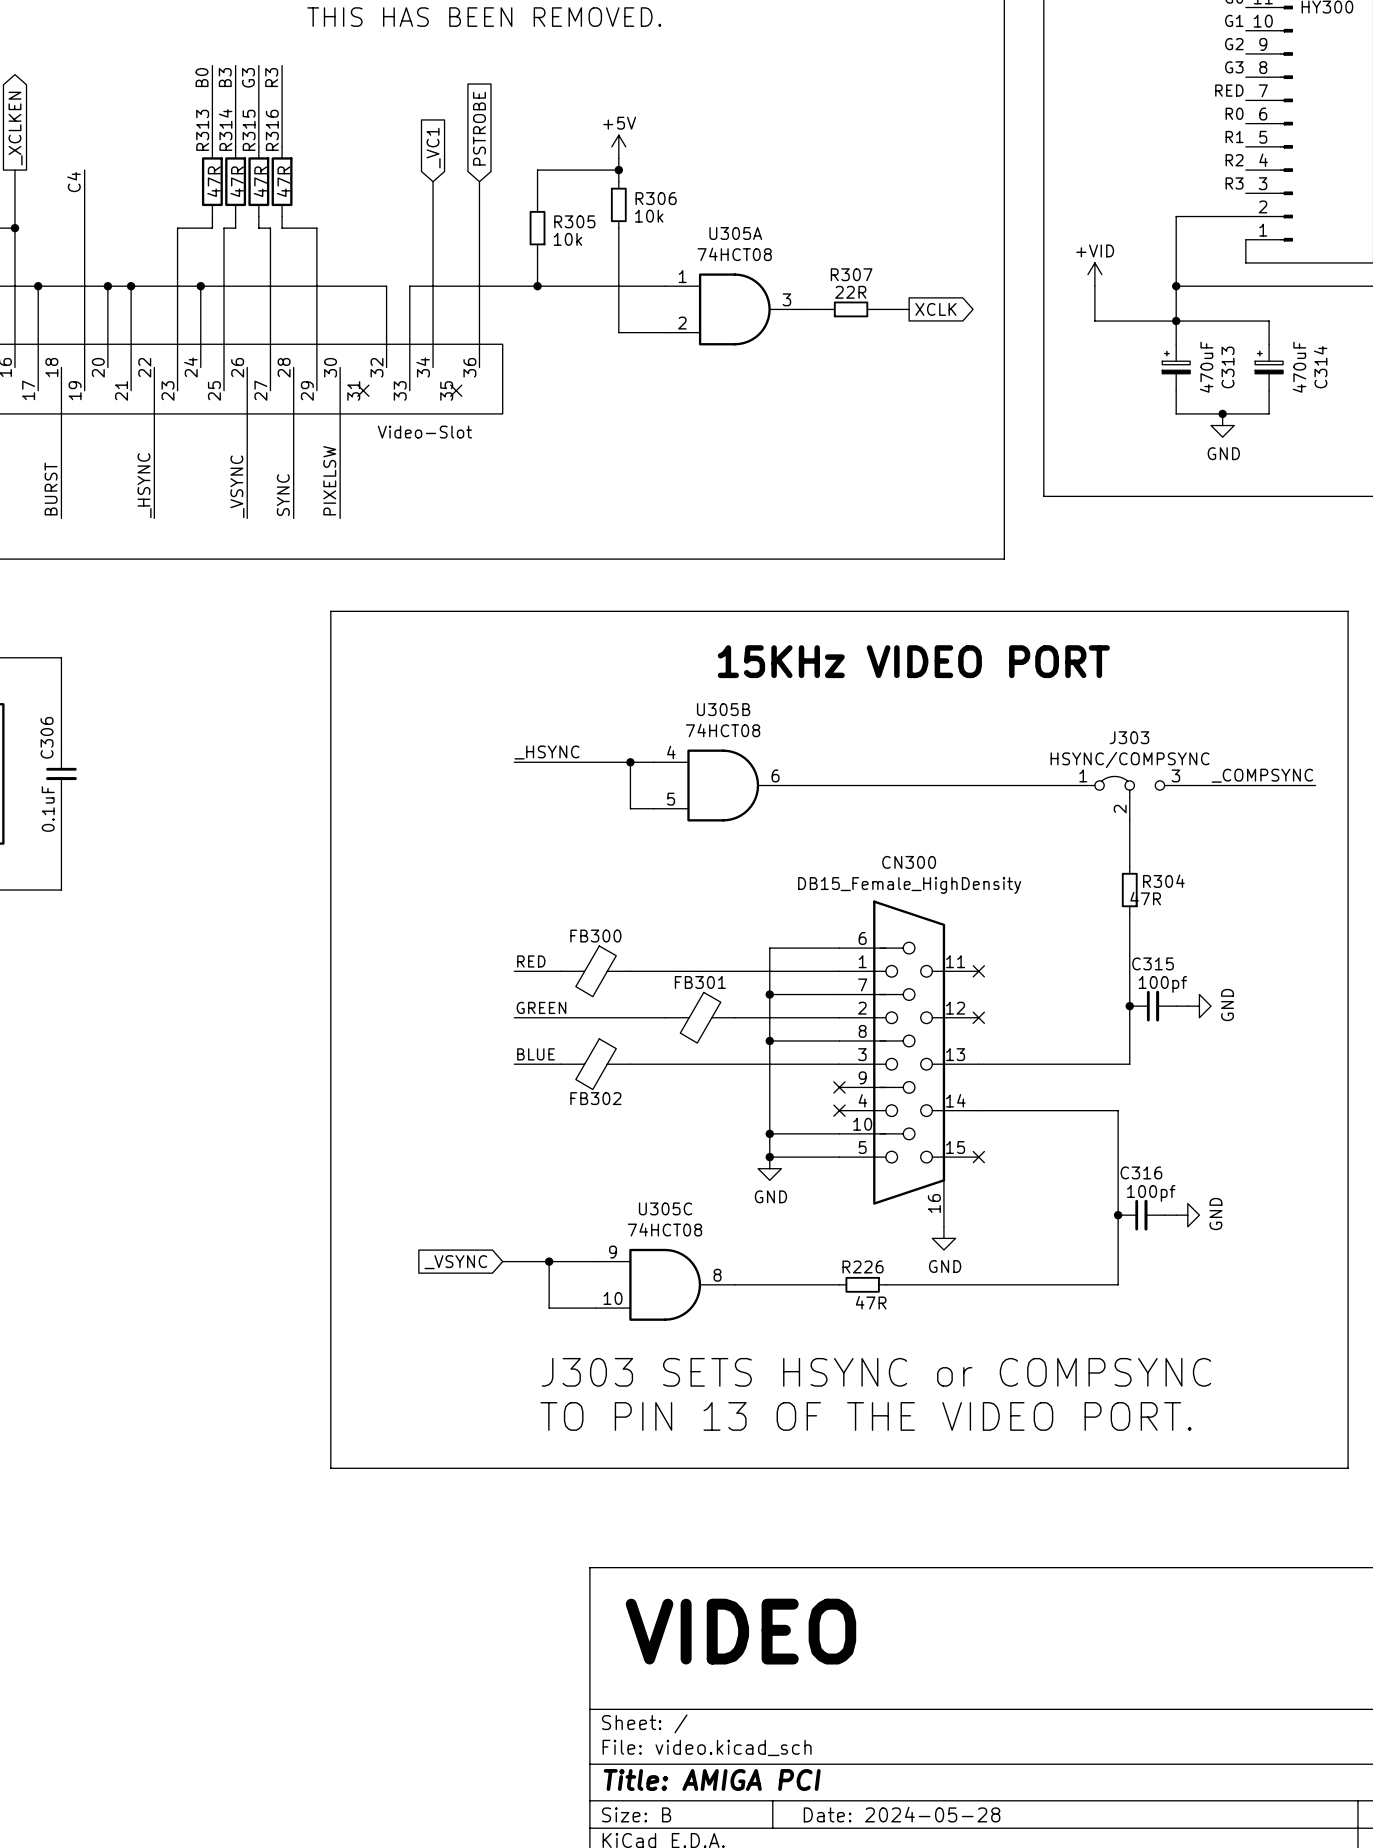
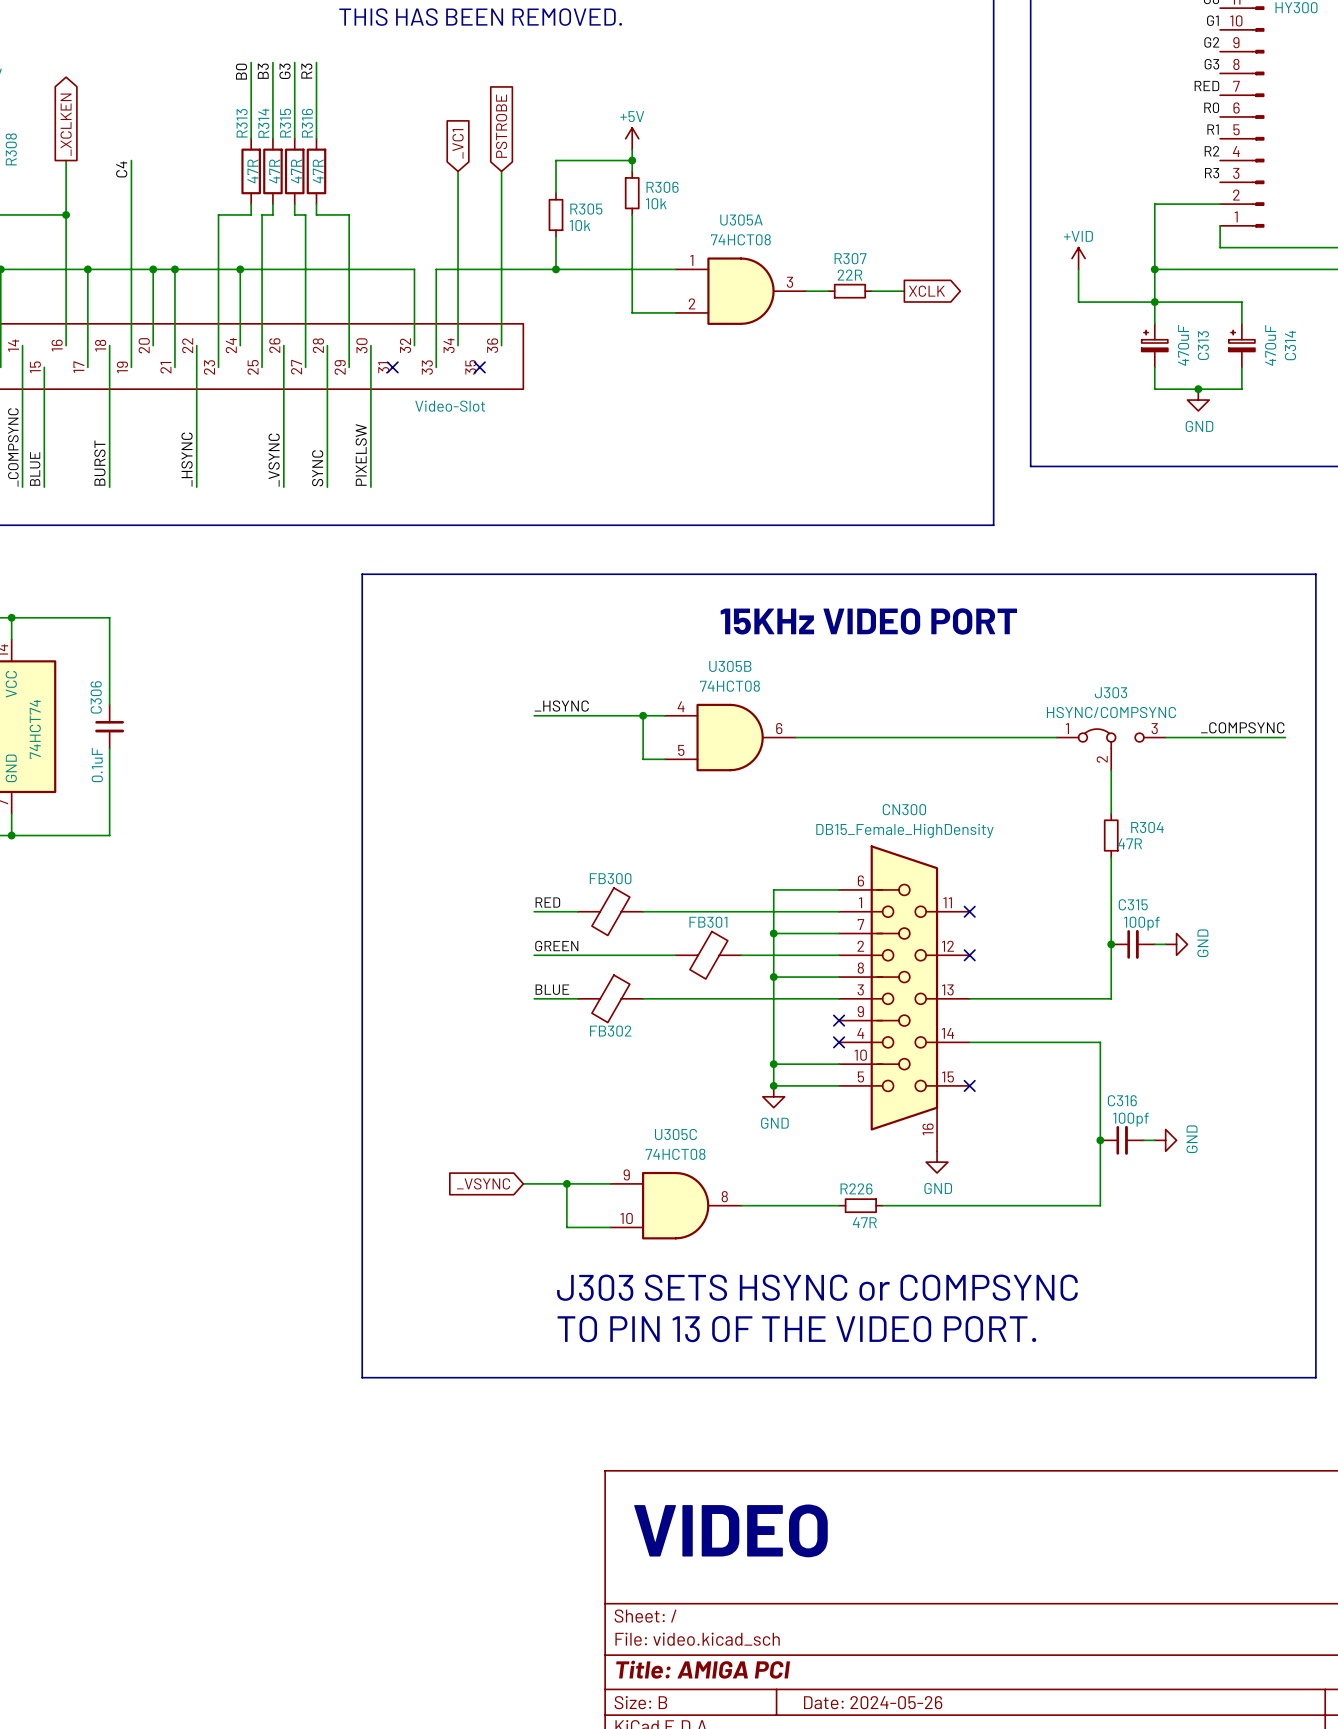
title block: Date: 2024-05-28 (902, 1814) -> Date: 2024-05-26 (873, 1702)

